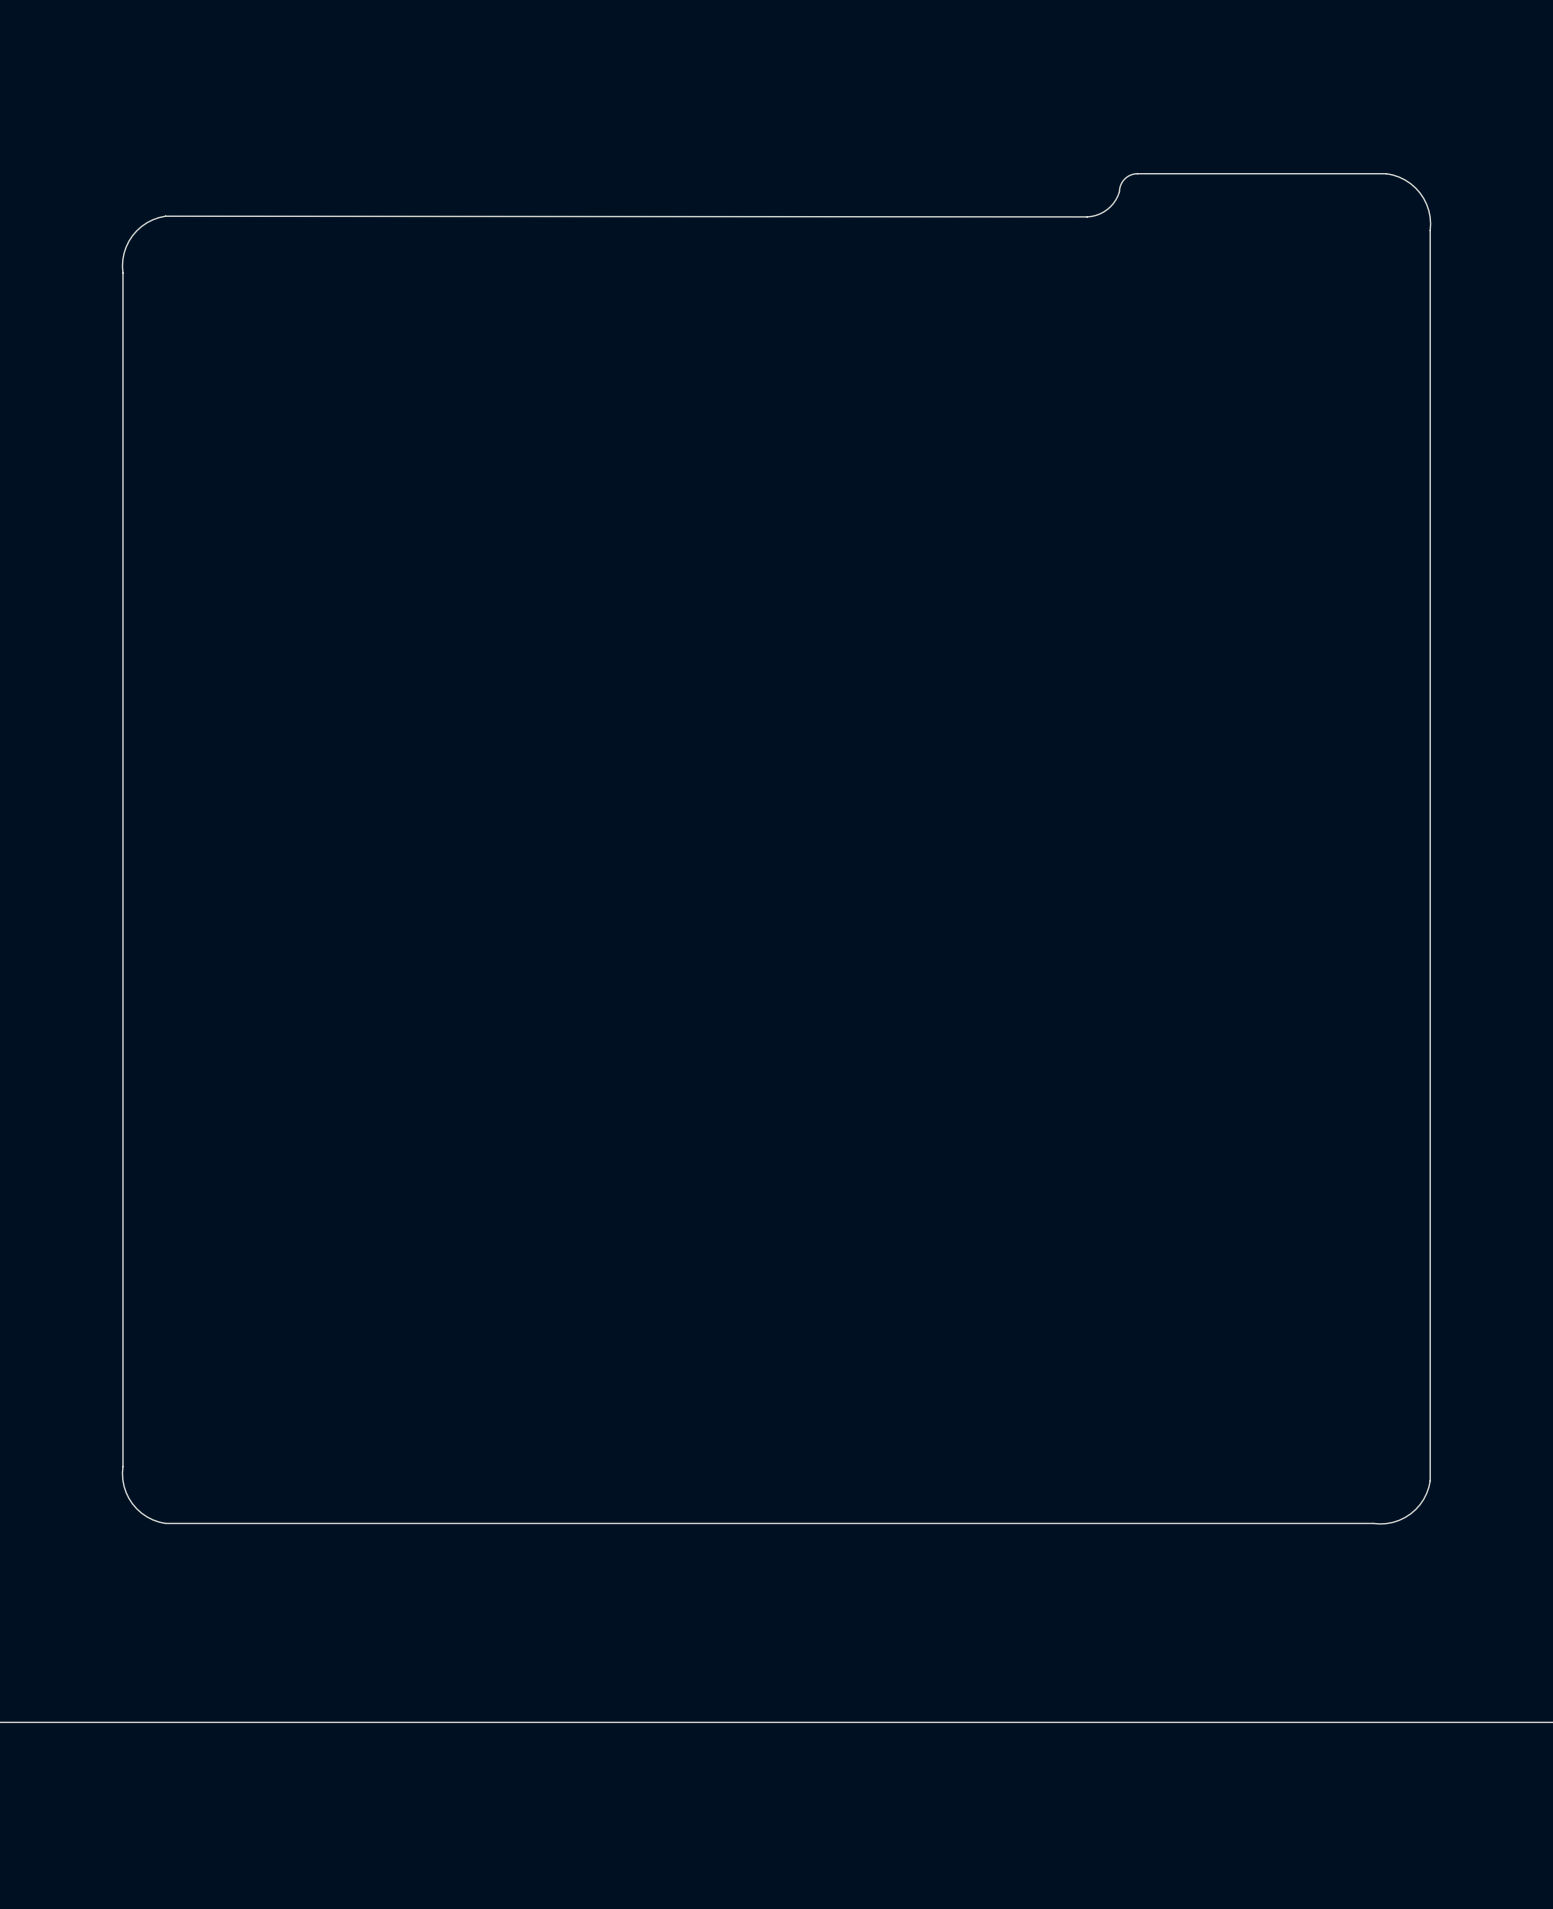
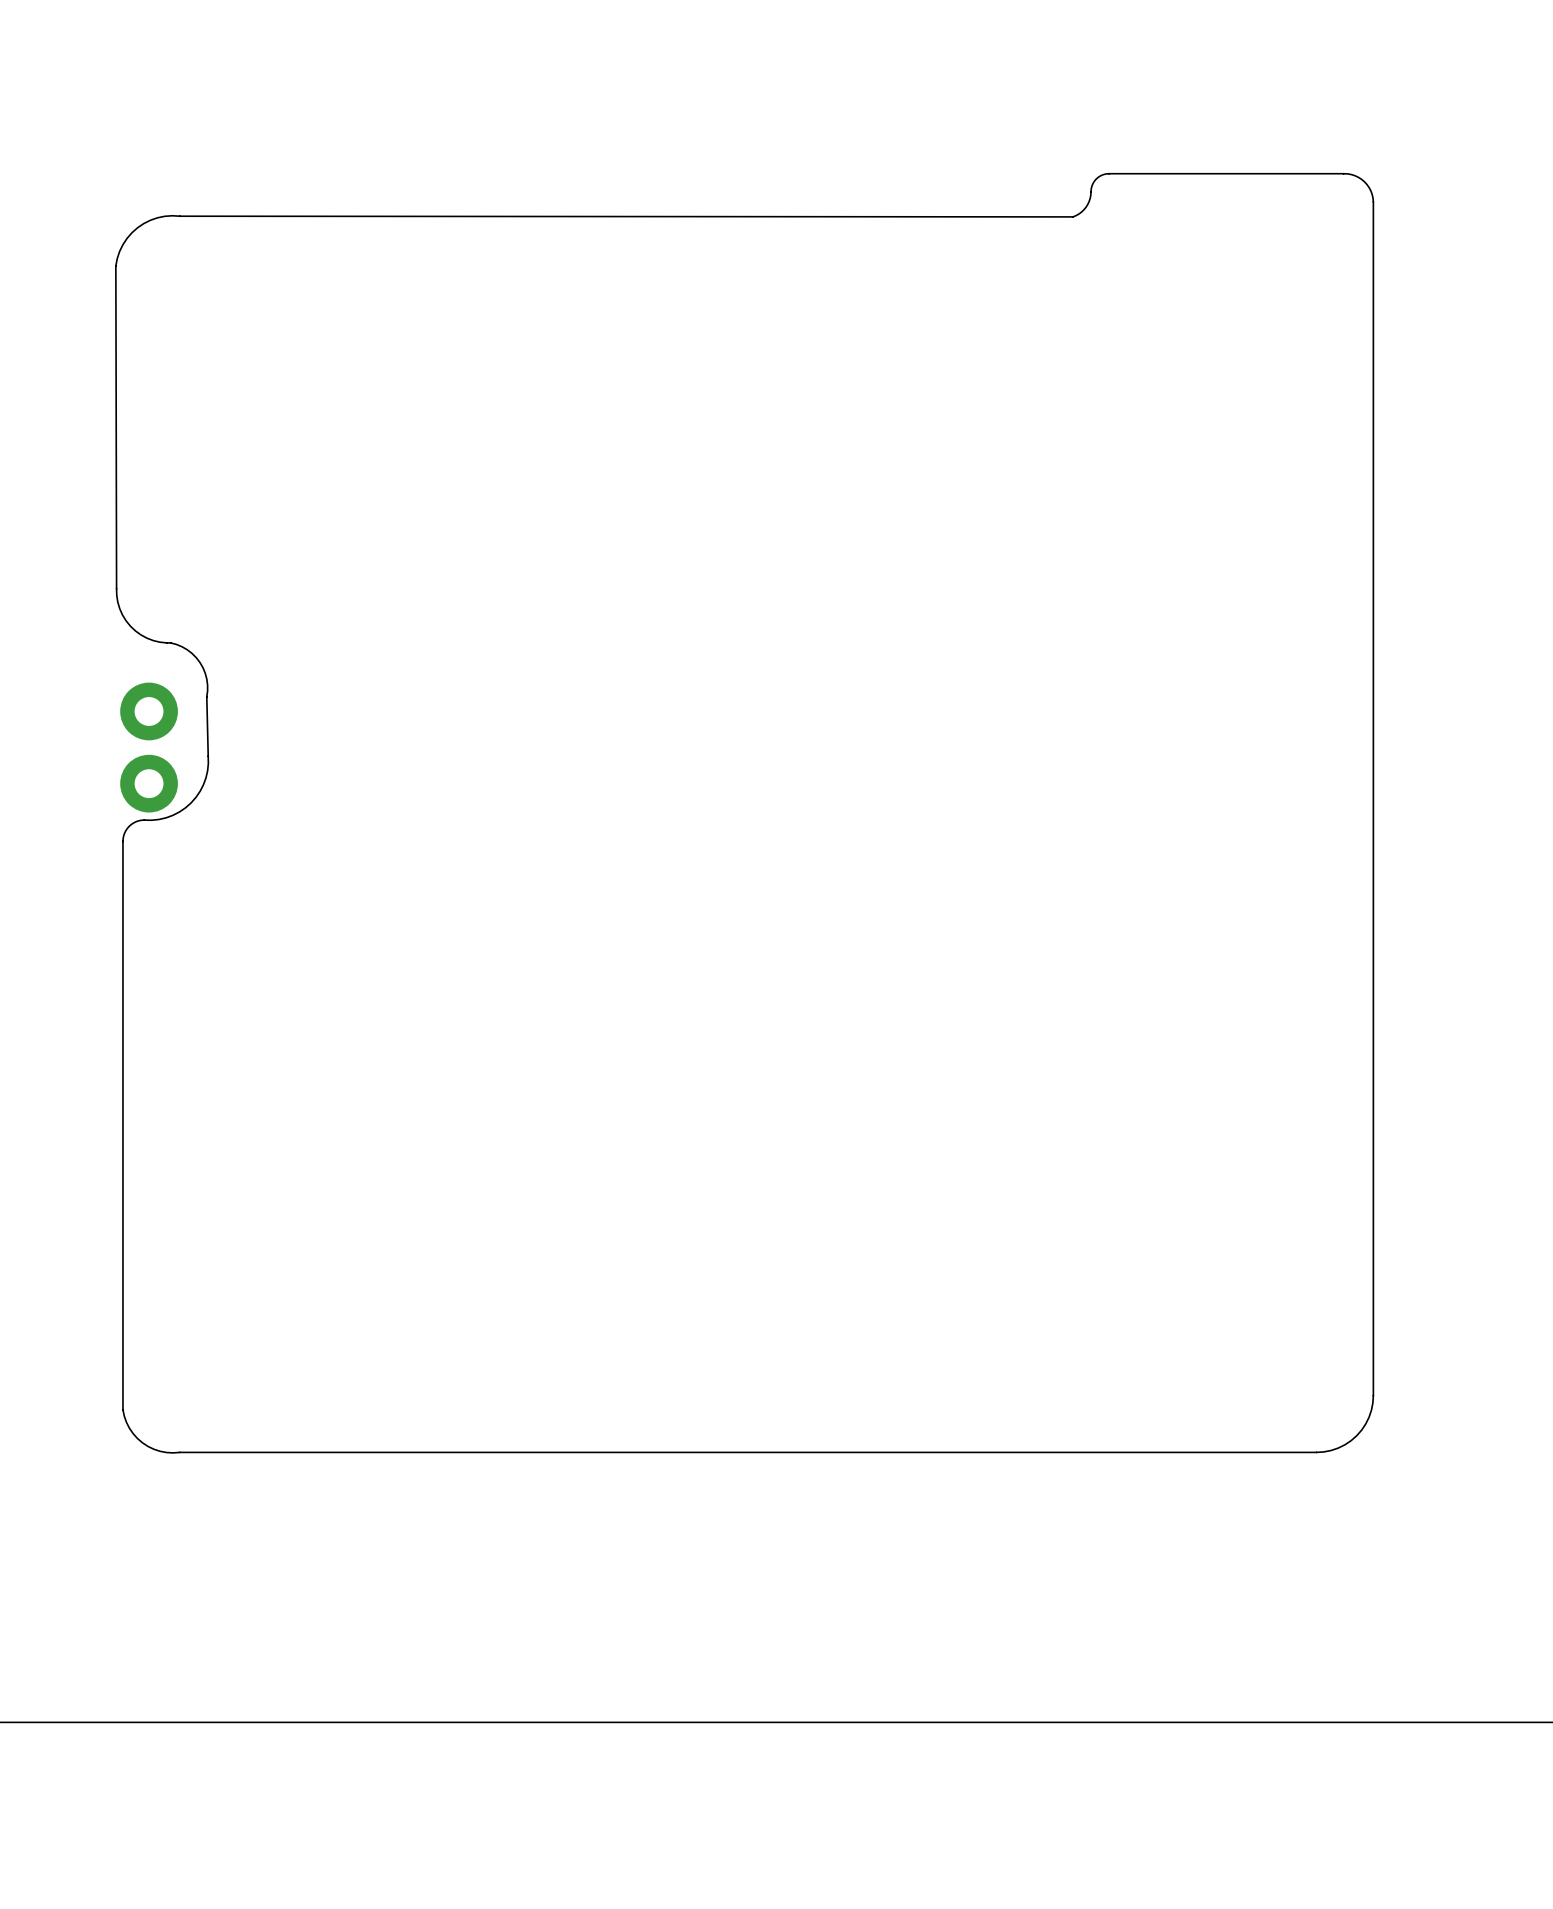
part footprint: [122, 173, 1431, 1524] -> [115, 173, 1374, 1453]

